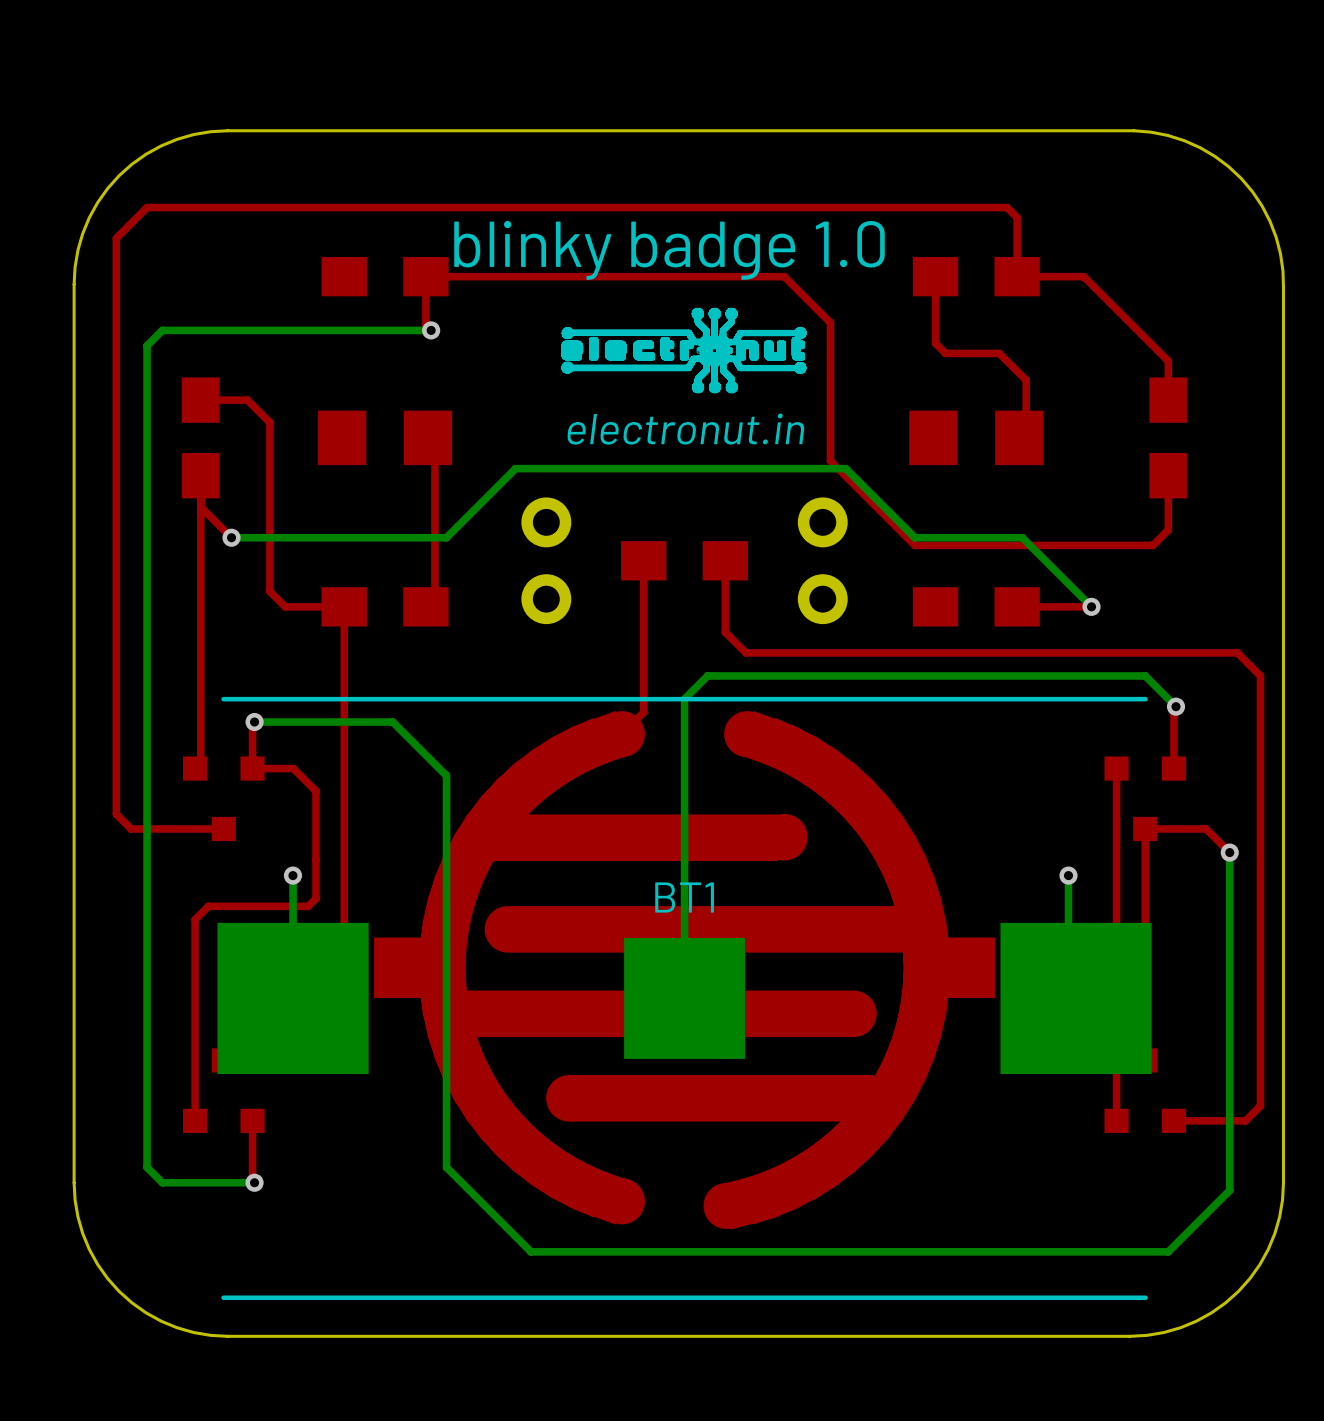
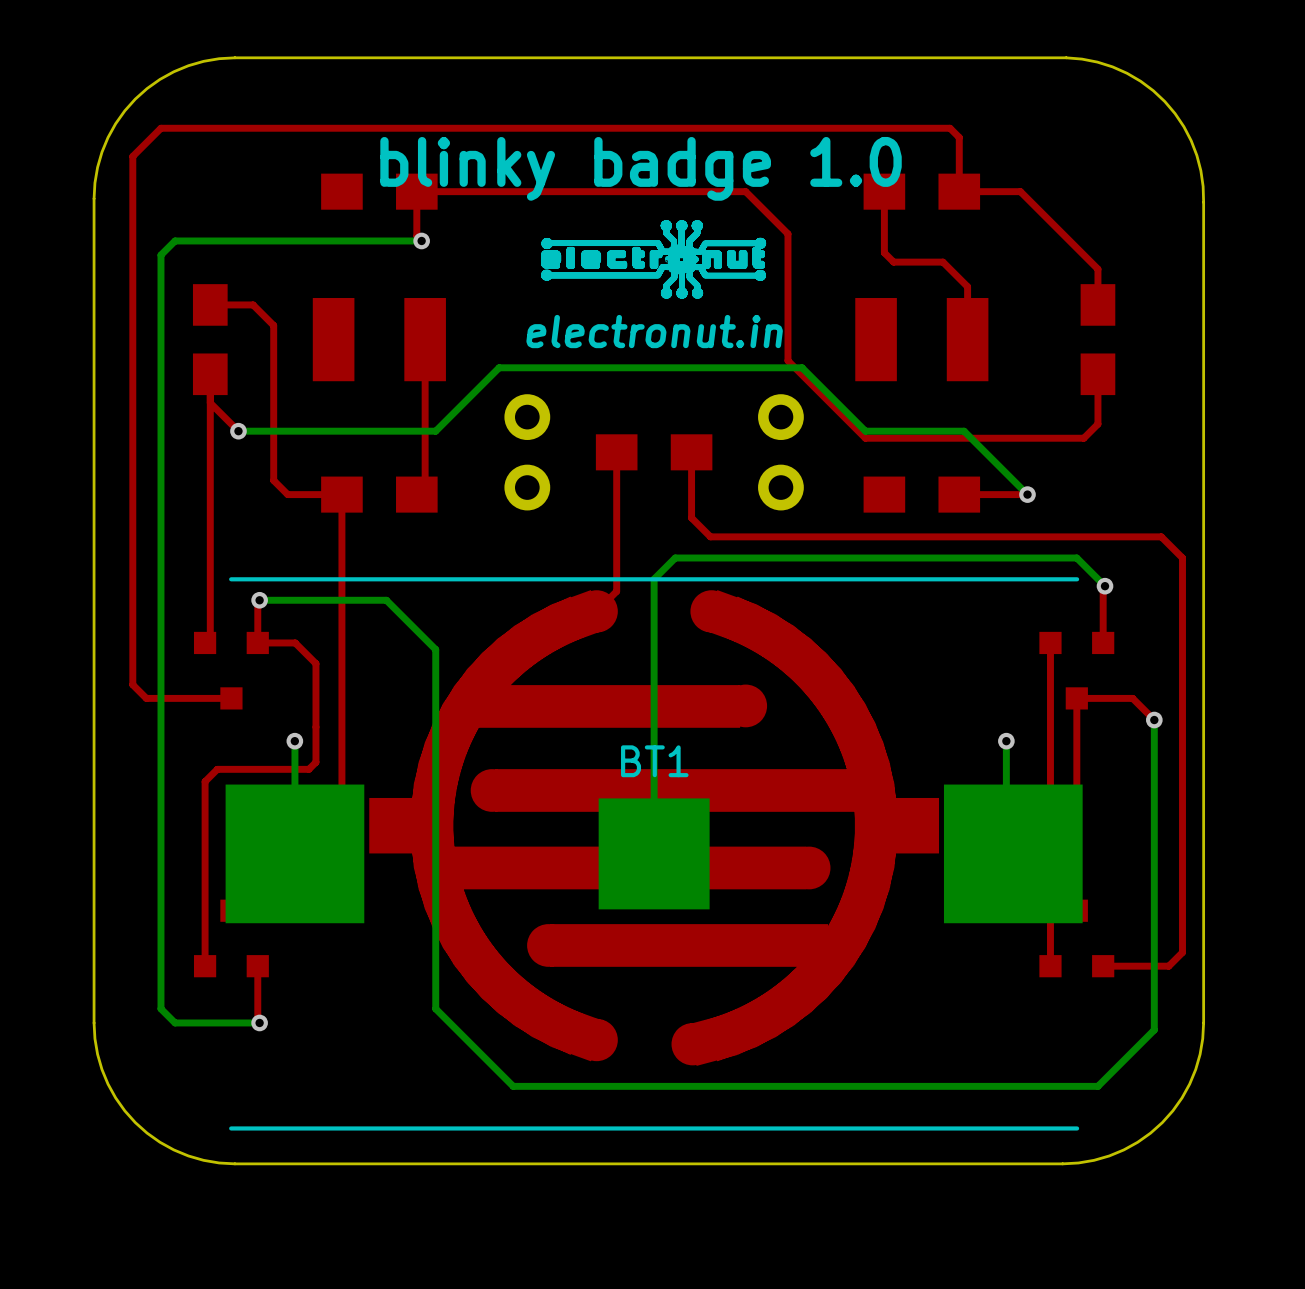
part footprint: [318, 410, 453, 466] -> [312, 298, 446, 382]
part footprint: [909, 410, 1044, 466] -> [855, 298, 989, 382]

